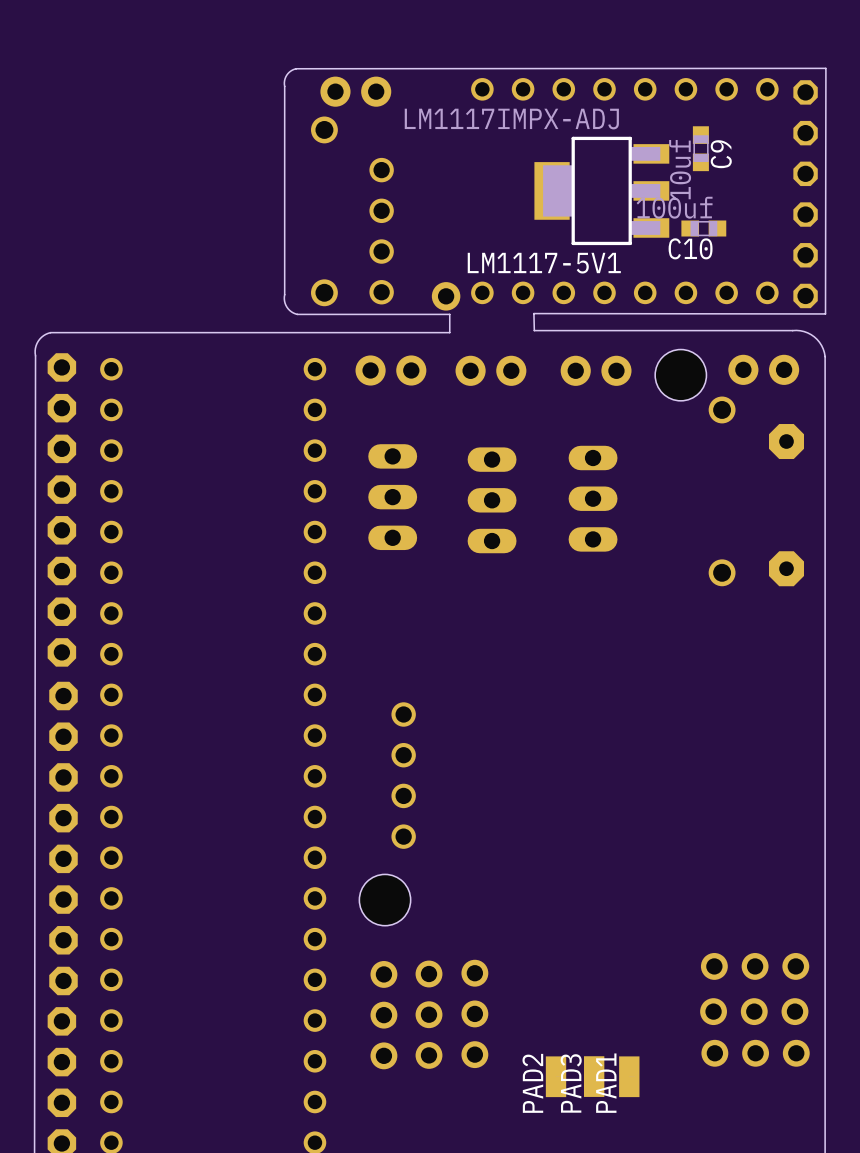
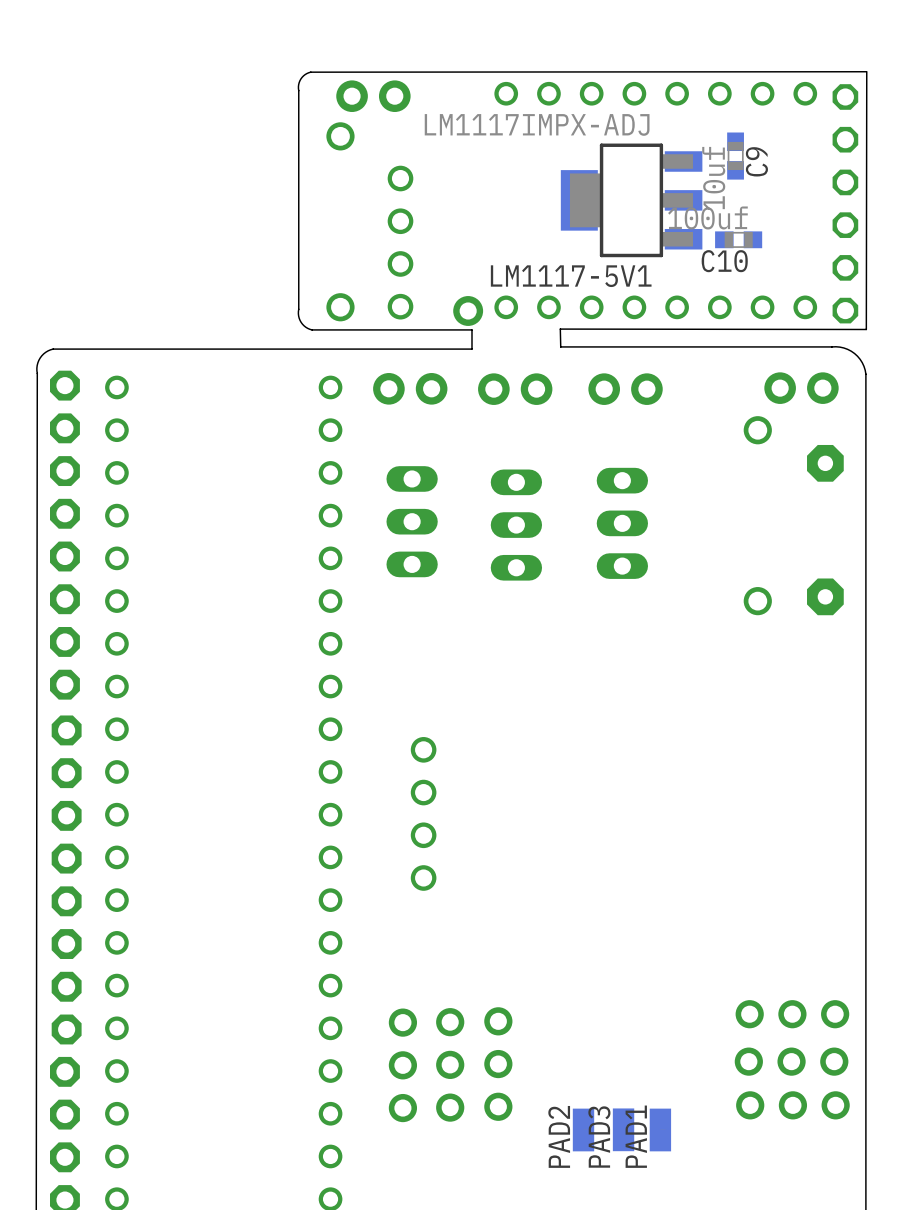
hole: (680, 375) -> none
hole: (385, 900) -> none

